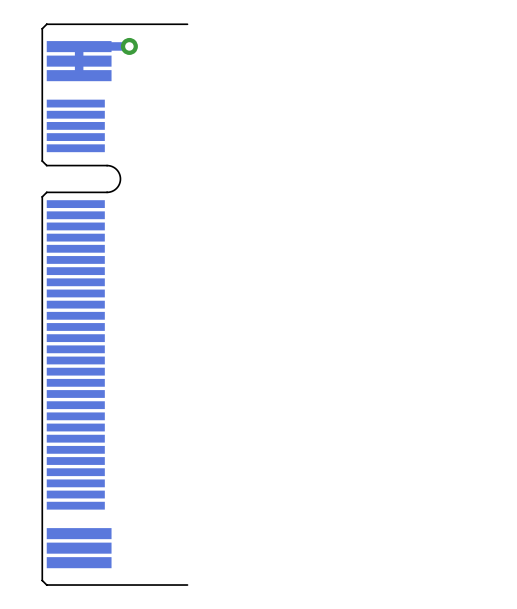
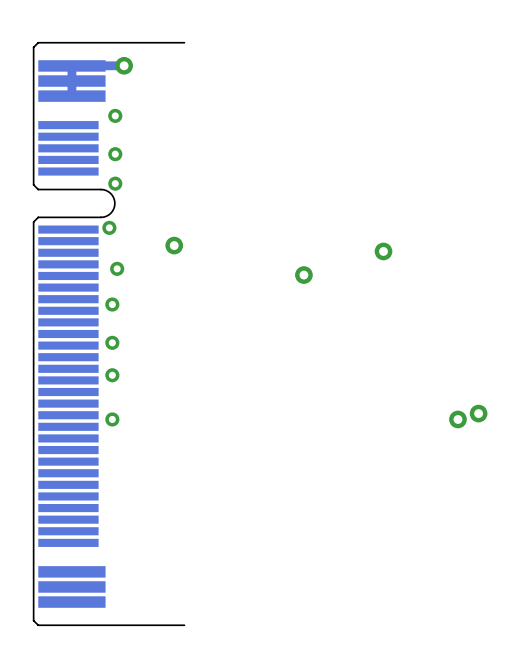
via: none -> (115, 115)
via: none -> (115, 154)
via: none -> (115, 183)
via: none -> (109, 227)
via: none -> (174, 245)
via: none -> (383, 251)
via: none -> (117, 268)
via: none -> (303, 275)
via: none -> (112, 304)
via: none -> (112, 342)
via: none -> (112, 375)
via: none -> (478, 413)
via: none -> (112, 419)
via: none -> (457, 419)

